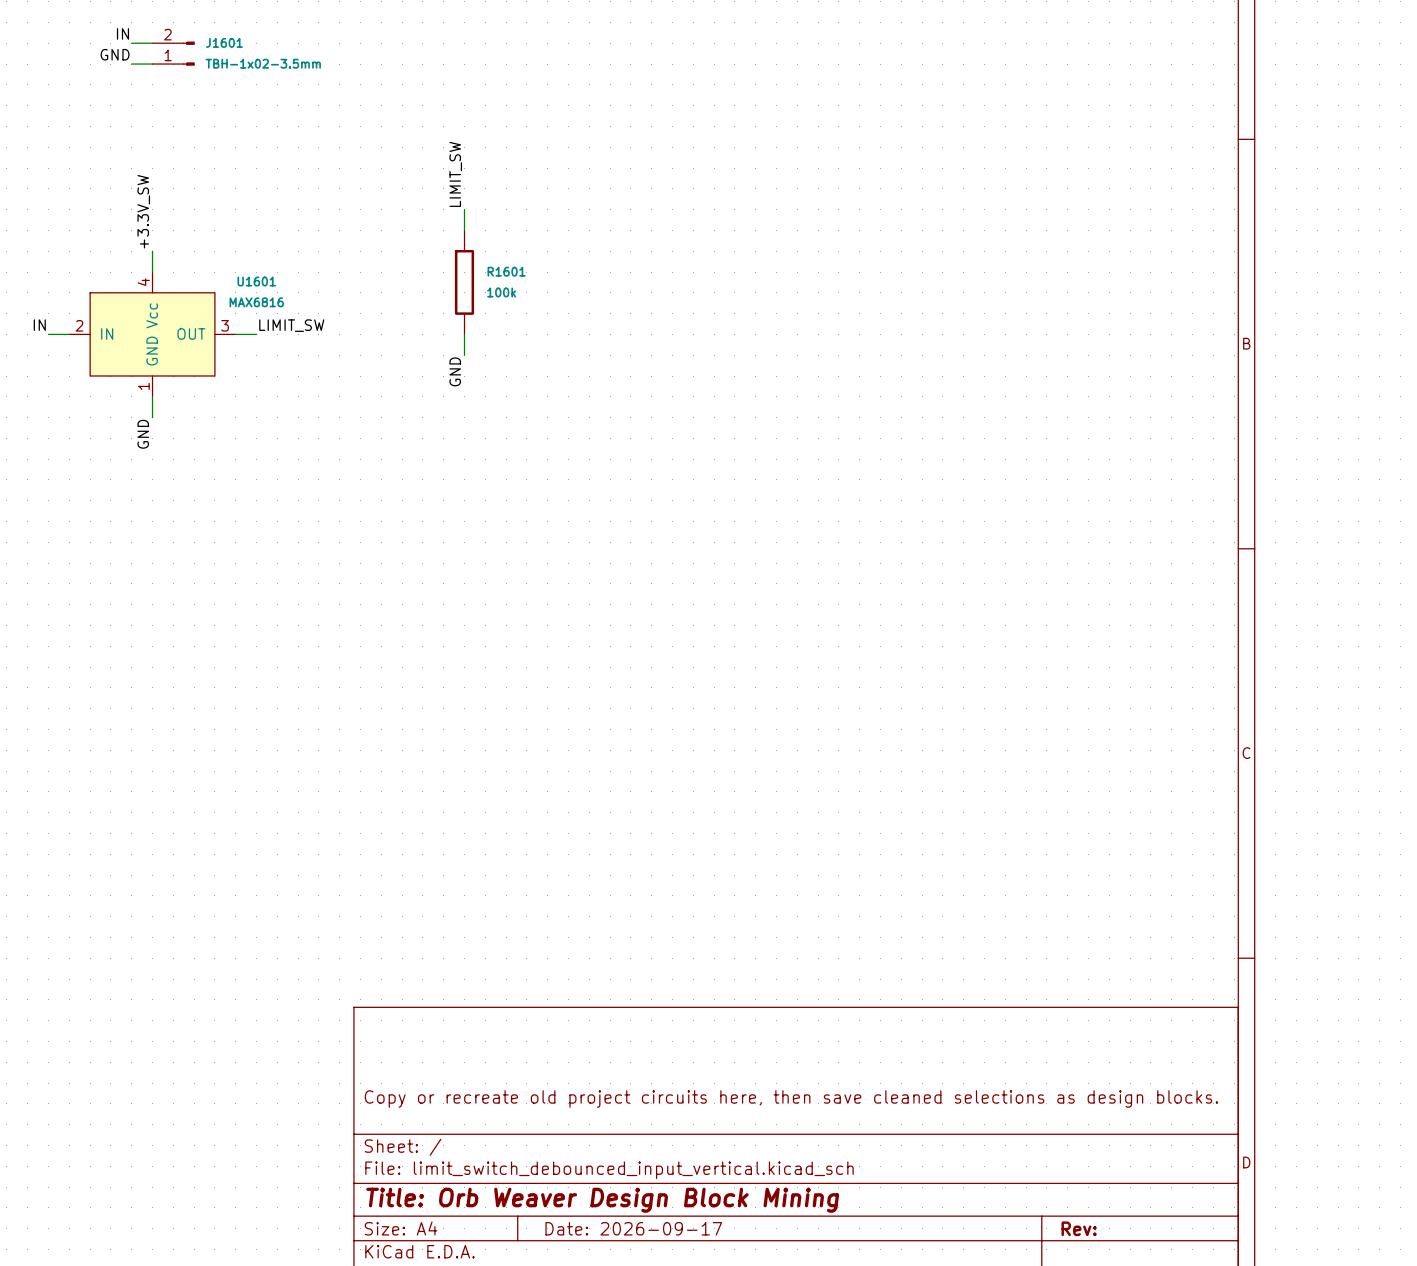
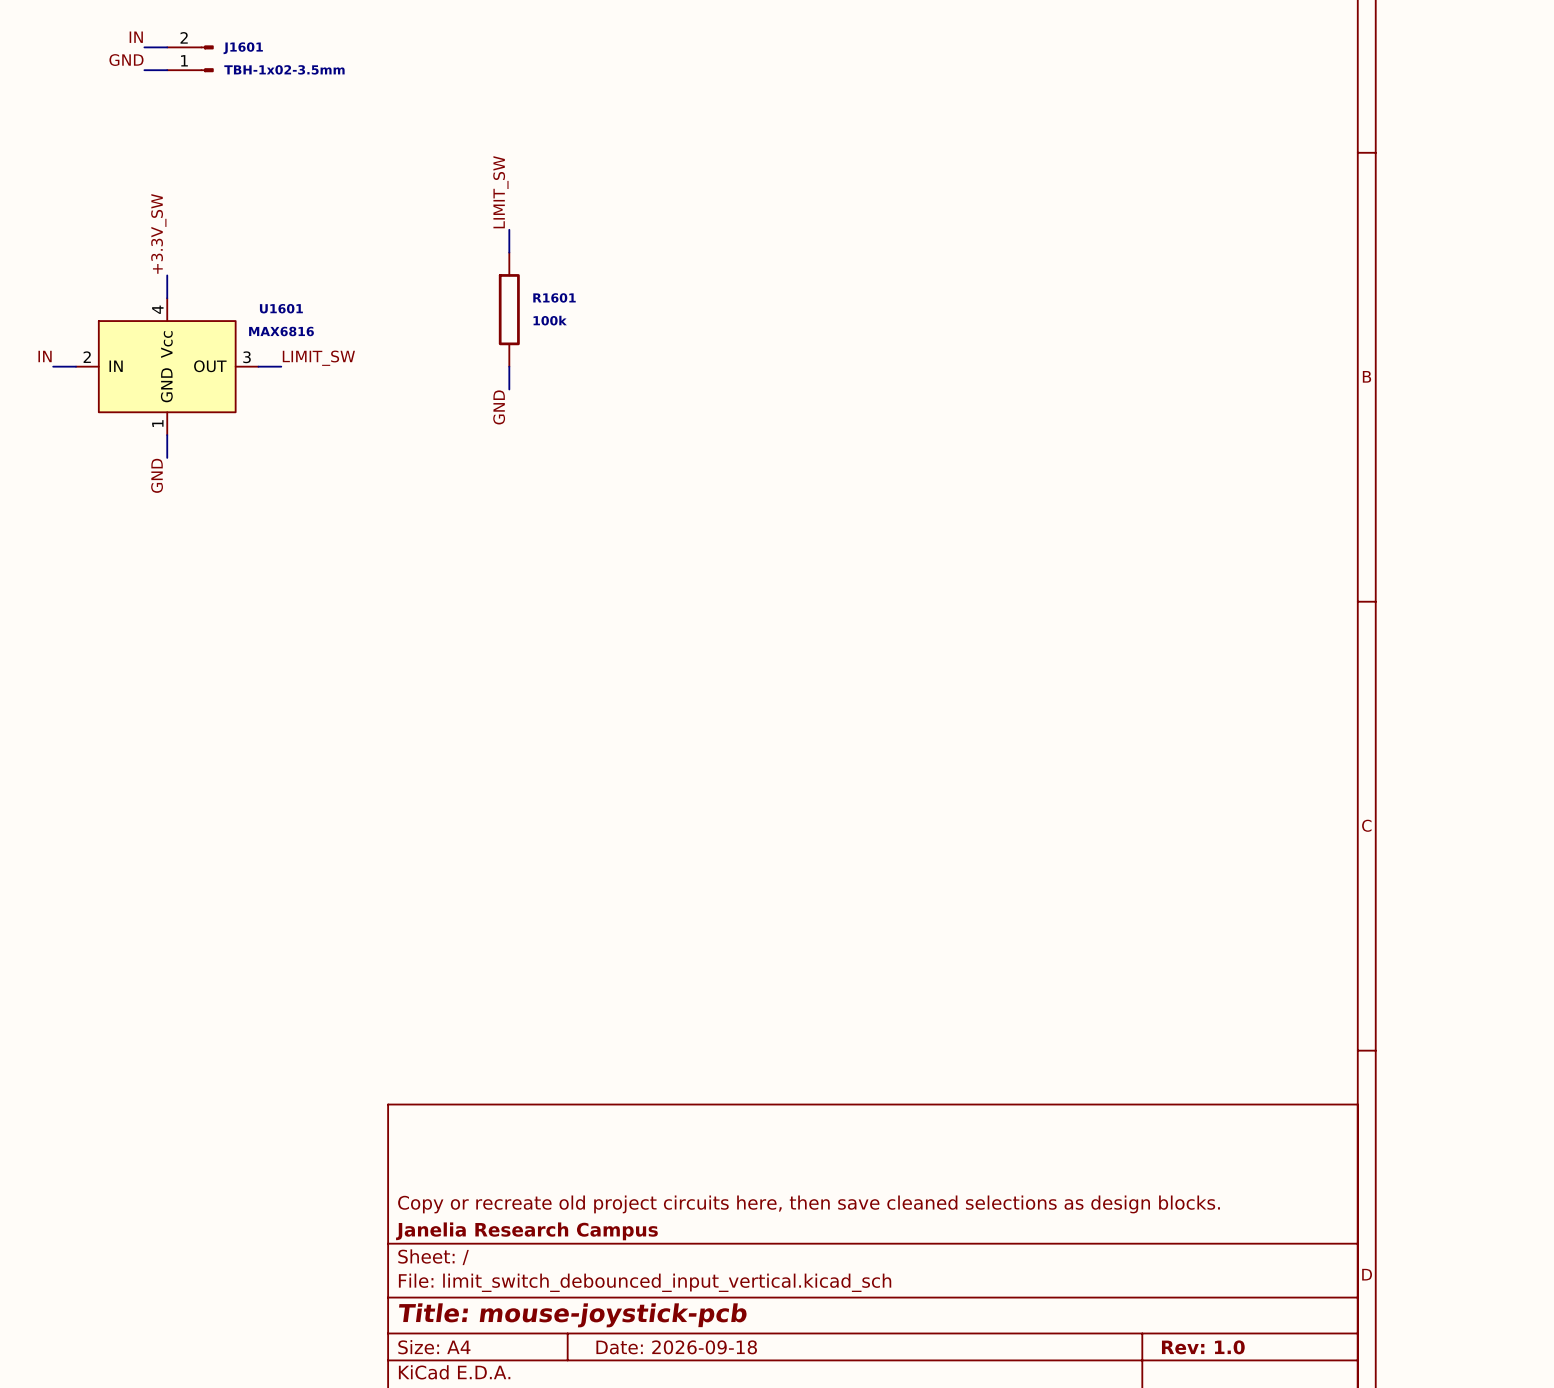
title block: none -> Janelia Research Campus (526, 1231)
title block: Title: Orb Weaver Design Block Mining (602, 1200) -> Title: mouse-joystick-pcb (572, 1315)
title block: Date: 2026-09-17 (633, 1228) -> Date: 2026-09-18 (676, 1347)
title block: Rev: (1079, 1228) -> Rev: 1.0 (1203, 1347)

